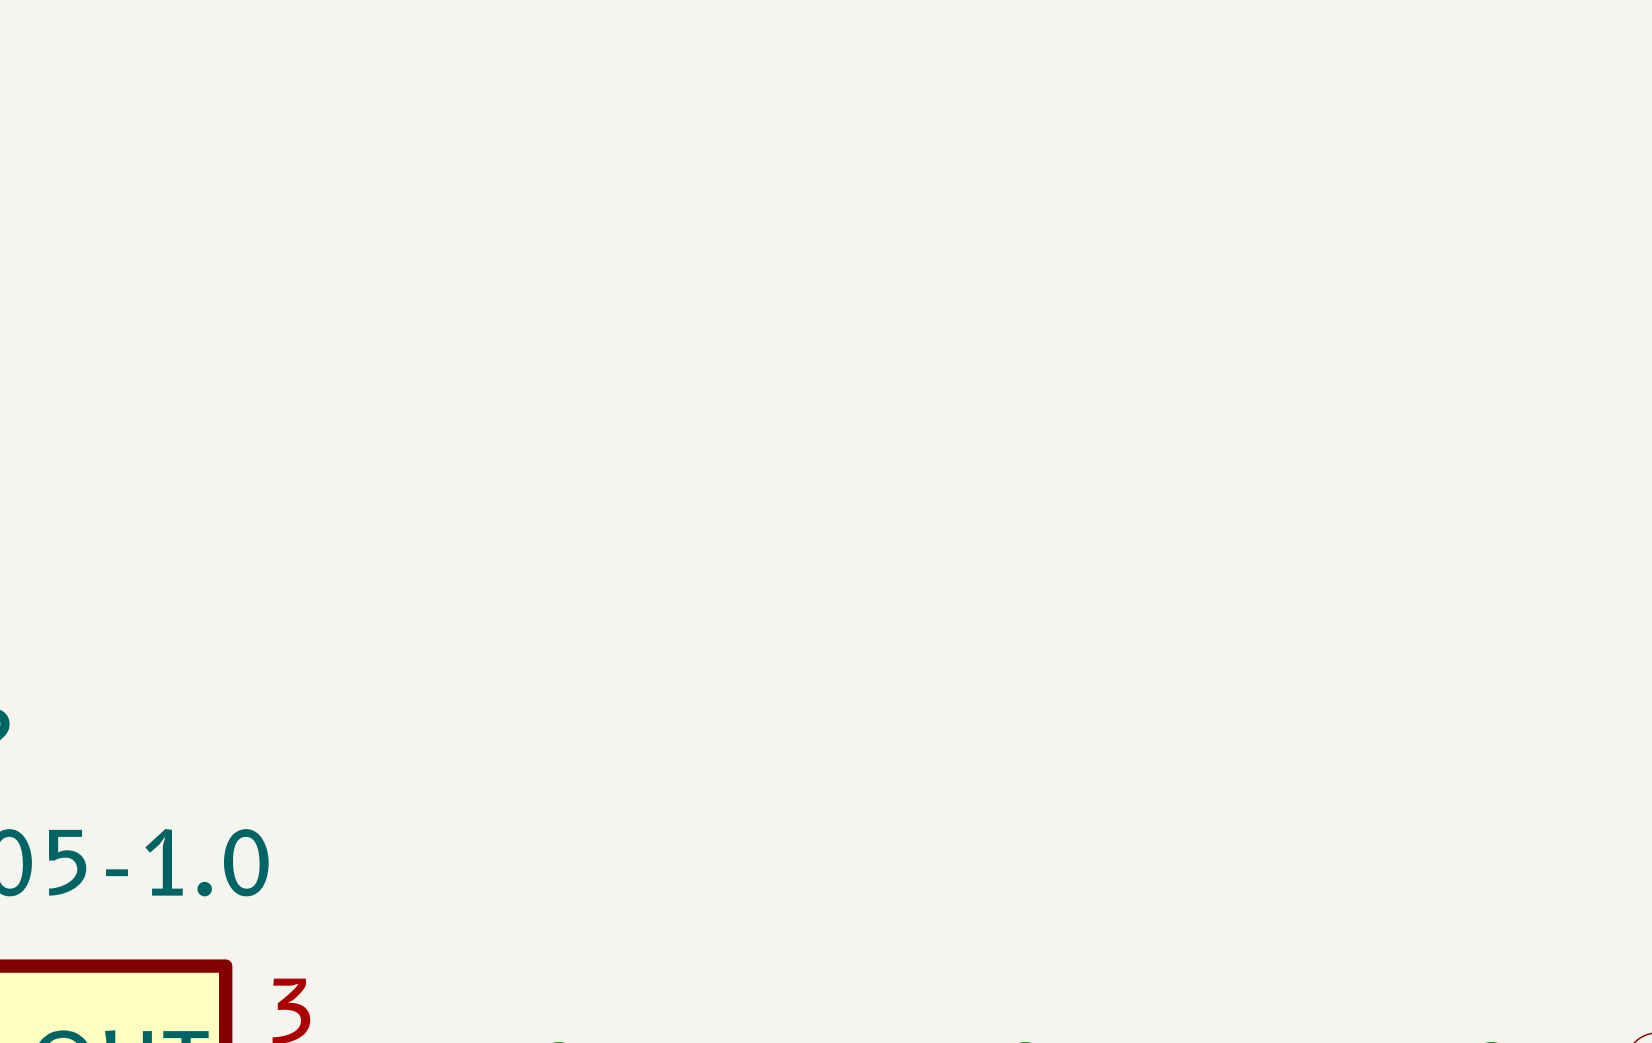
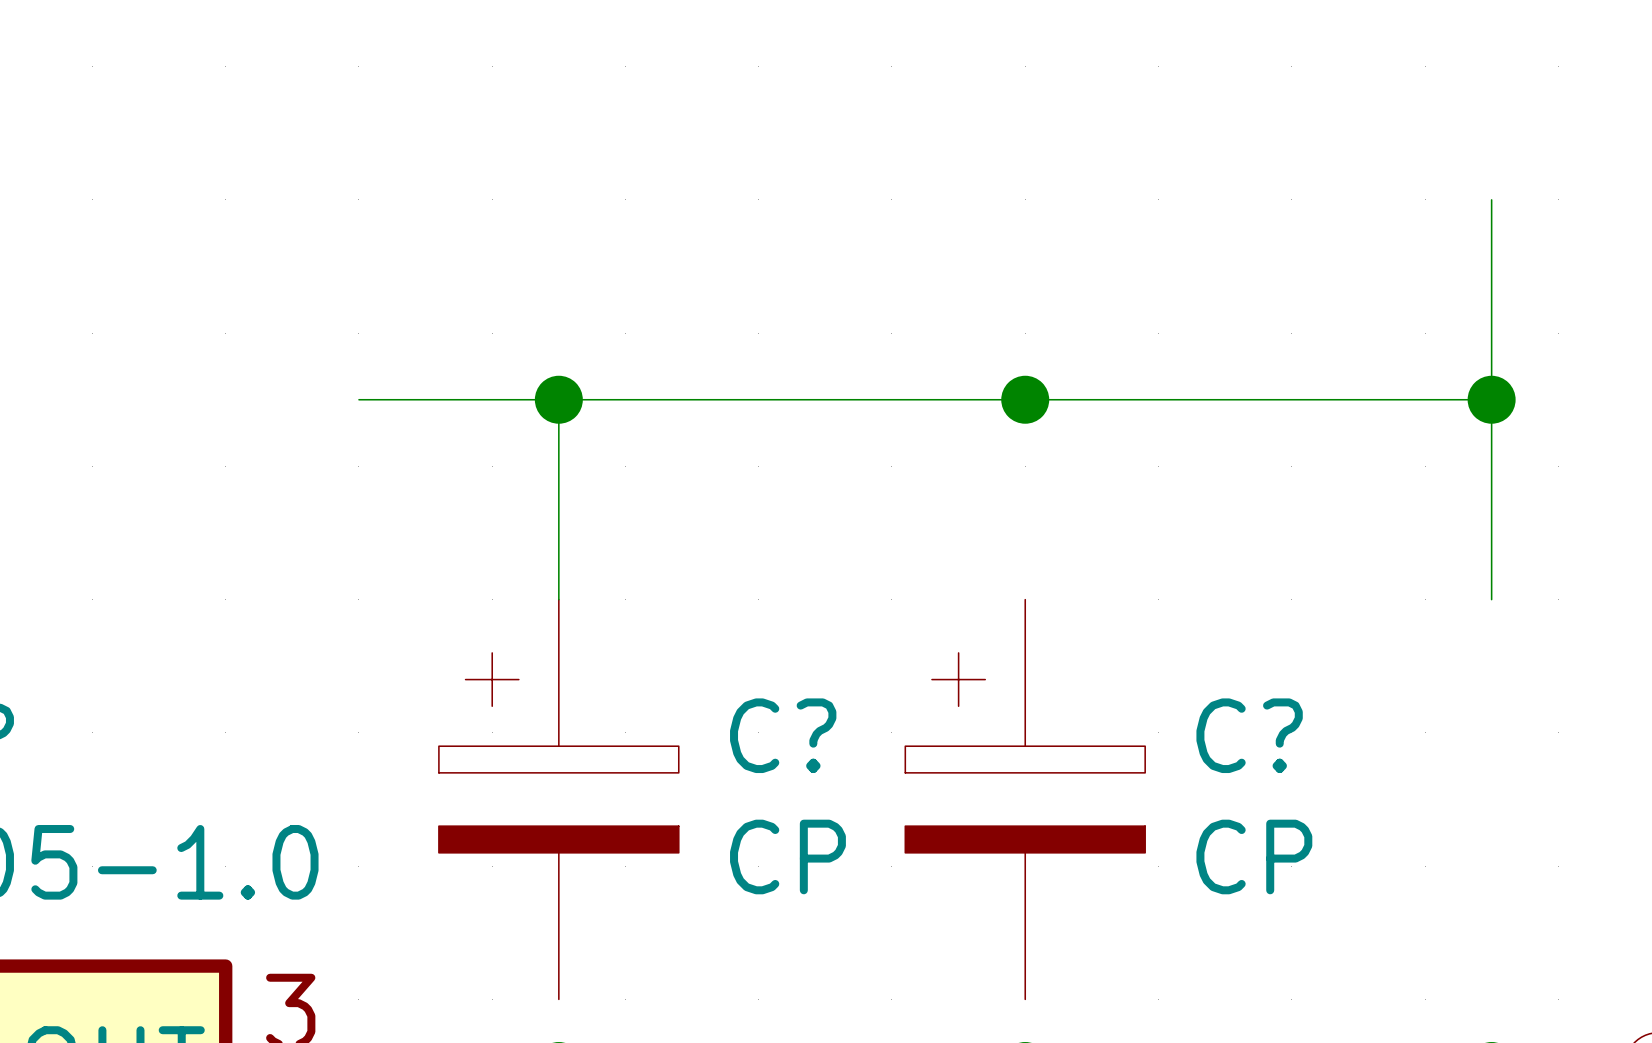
wire: none -> (1491, 199) (1491, 599)
wire: none -> (358, 399) (1491, 399)
wire: none -> (558, 399) (558, 599)
junction: none -> (558, 399)
junction: none -> (1025, 399)
junction: none -> (1491, 399)
C?: none -> CP (558, 799)
C?: none -> CP (1025, 799)

